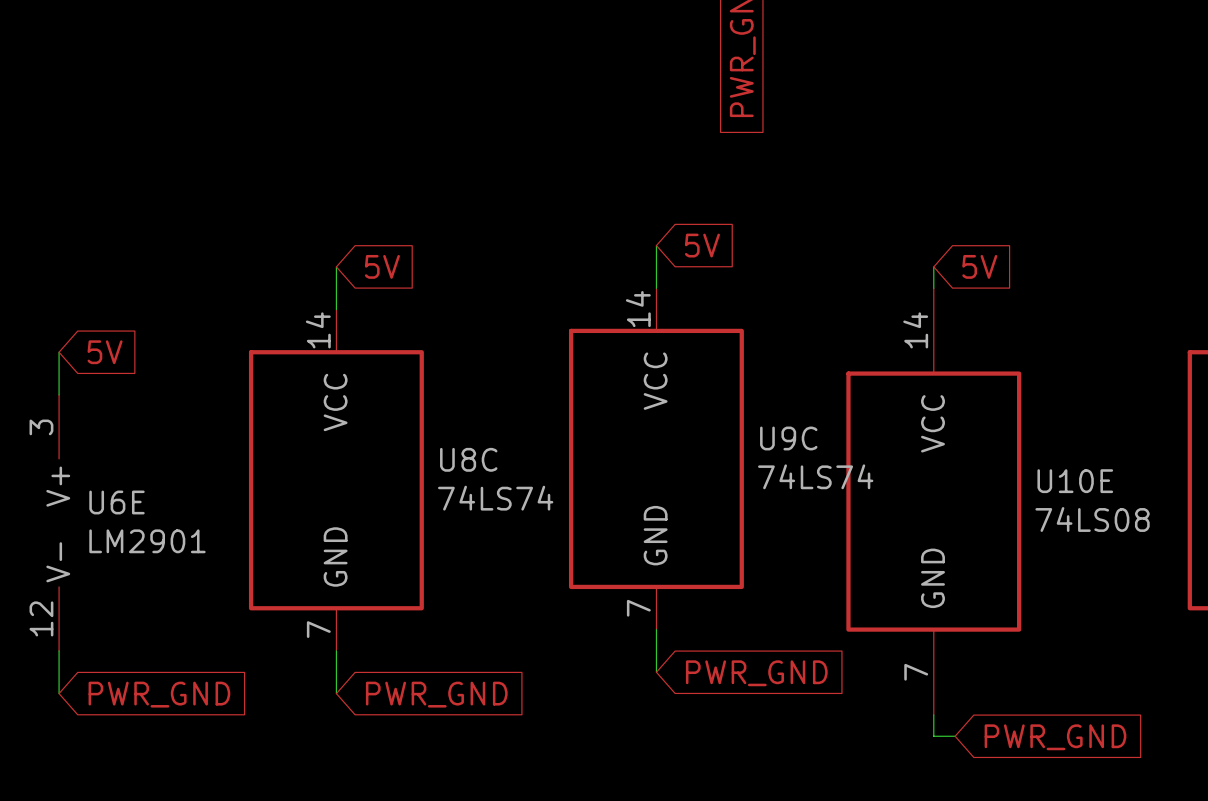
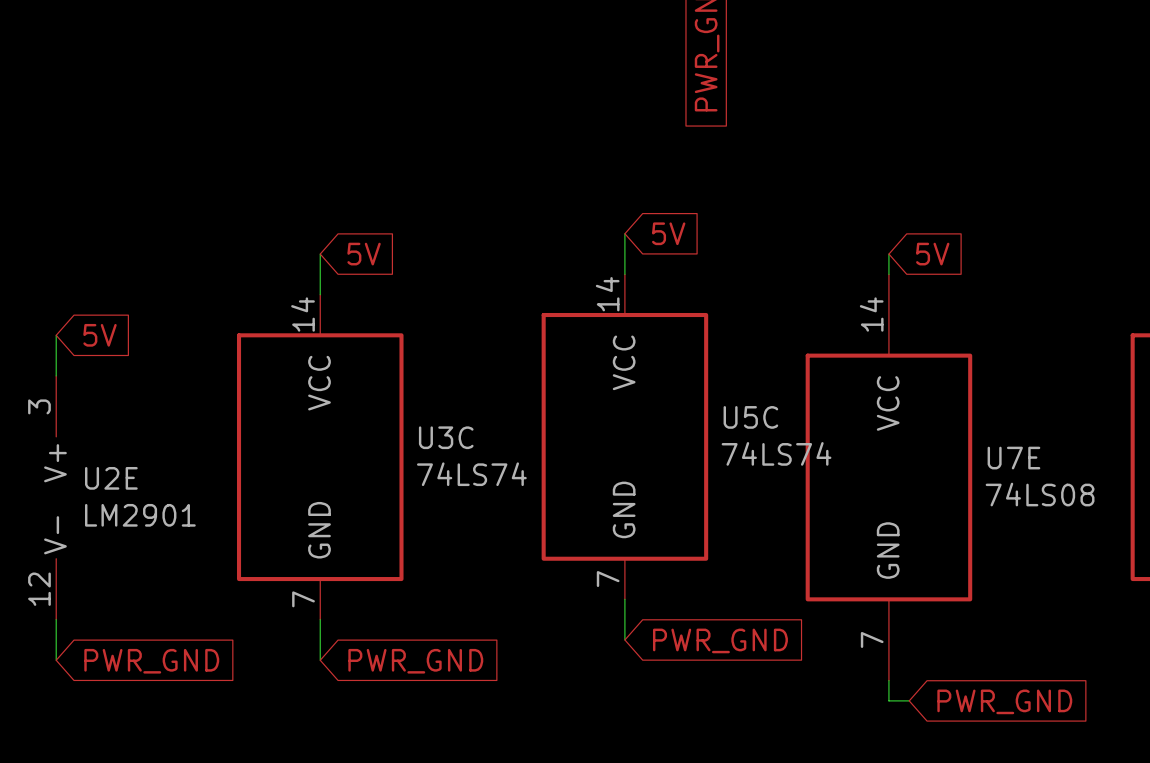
U9C name: U9C (788, 438) -> U5C (750, 417)
U8C name: U8C (468, 459) -> U3C (446, 437)
U10E name: U10E (1075, 481) -> U7E (1013, 458)
U6E name: U6E (116, 502) -> U2E (111, 478)

